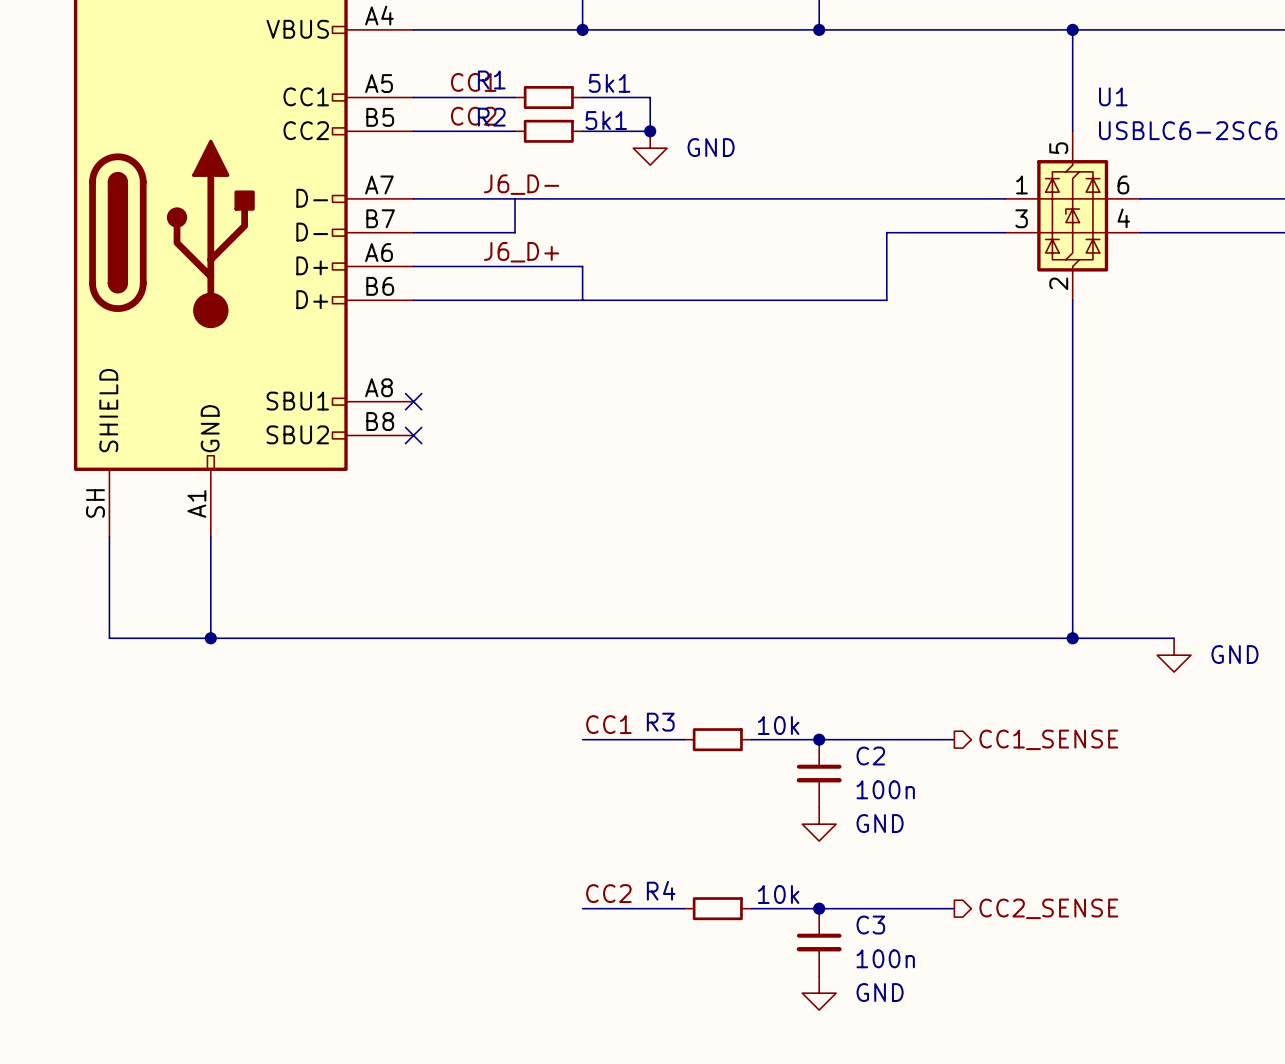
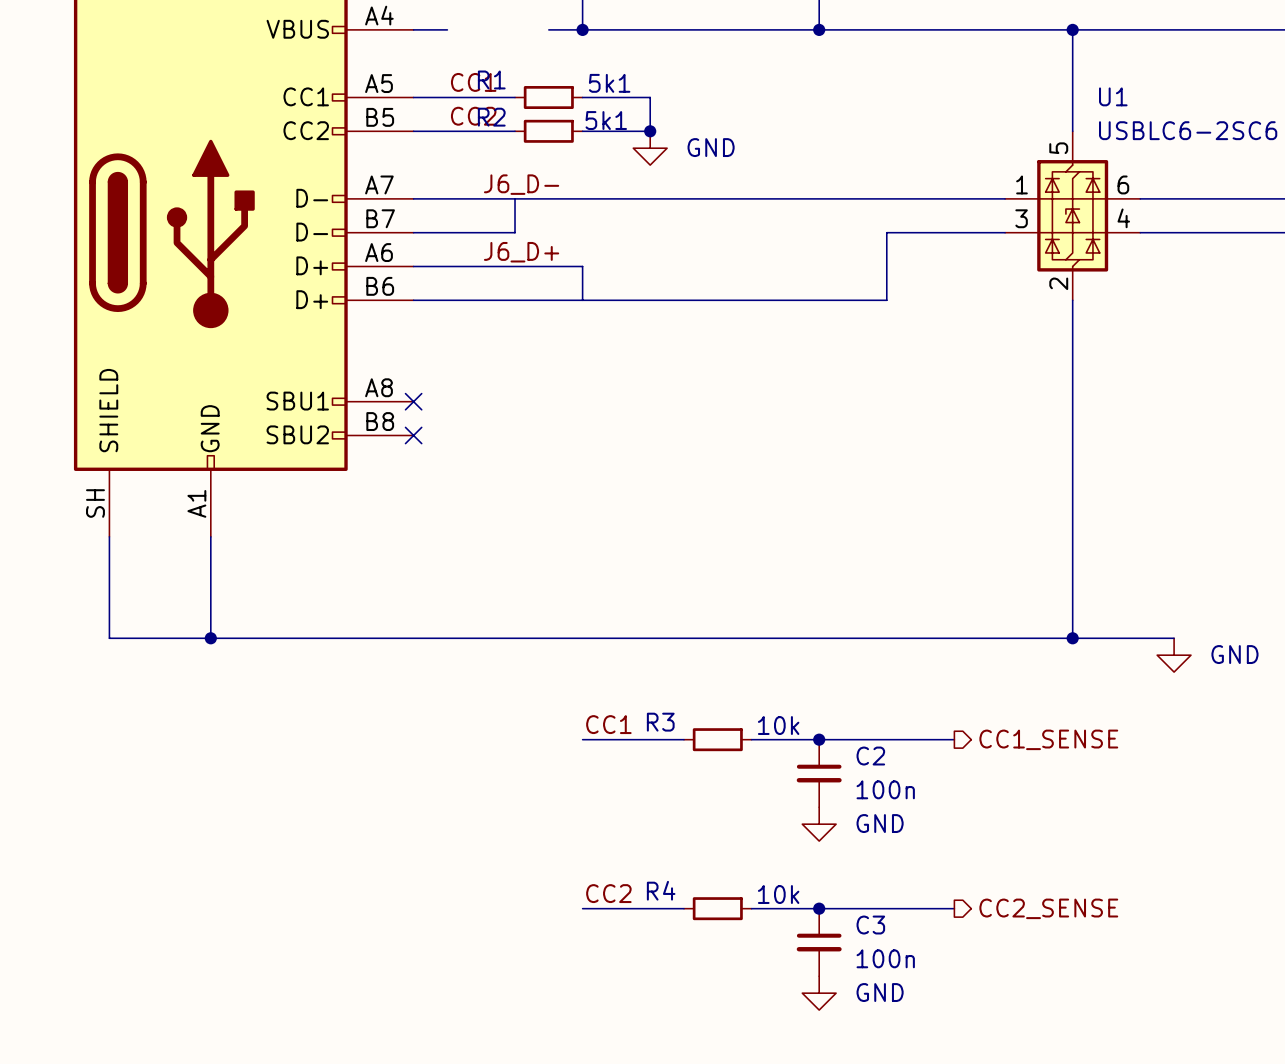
wire: (447, 29) (548, 29) -> none

